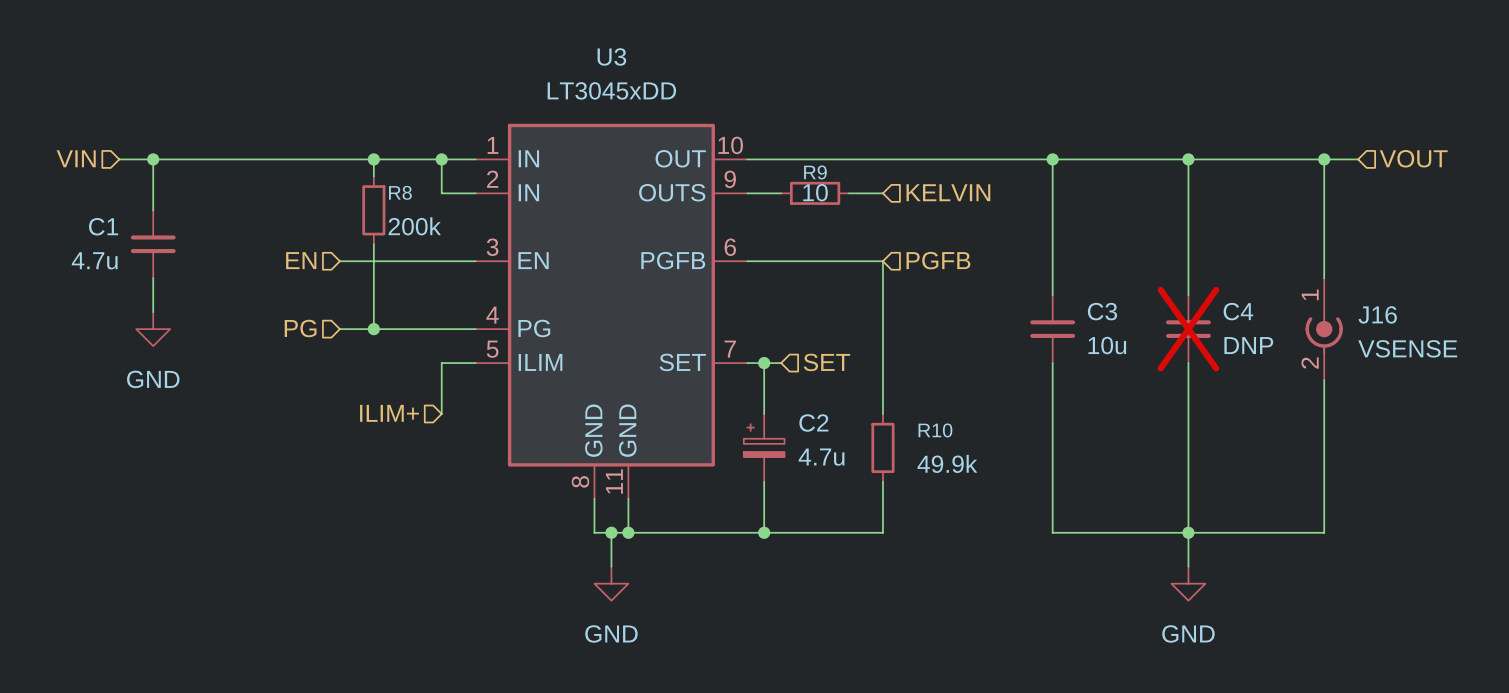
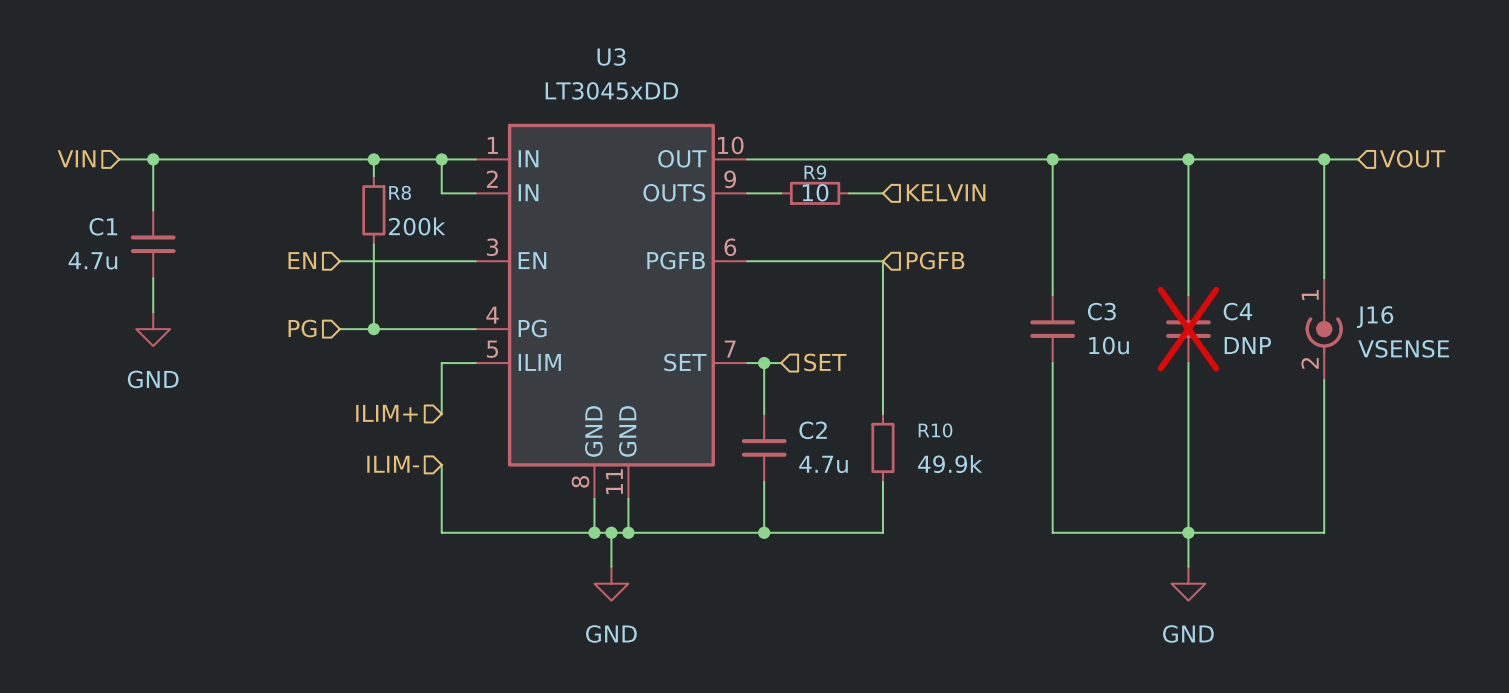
C2 symbol: [743, 413, 785, 482] -> [741, 413, 787, 482]
hierarchical label: none -> ILIM- (393, 464)
wire: none -> (441, 464) (441, 532) (594, 532)
junction: none -> (594, 532)

